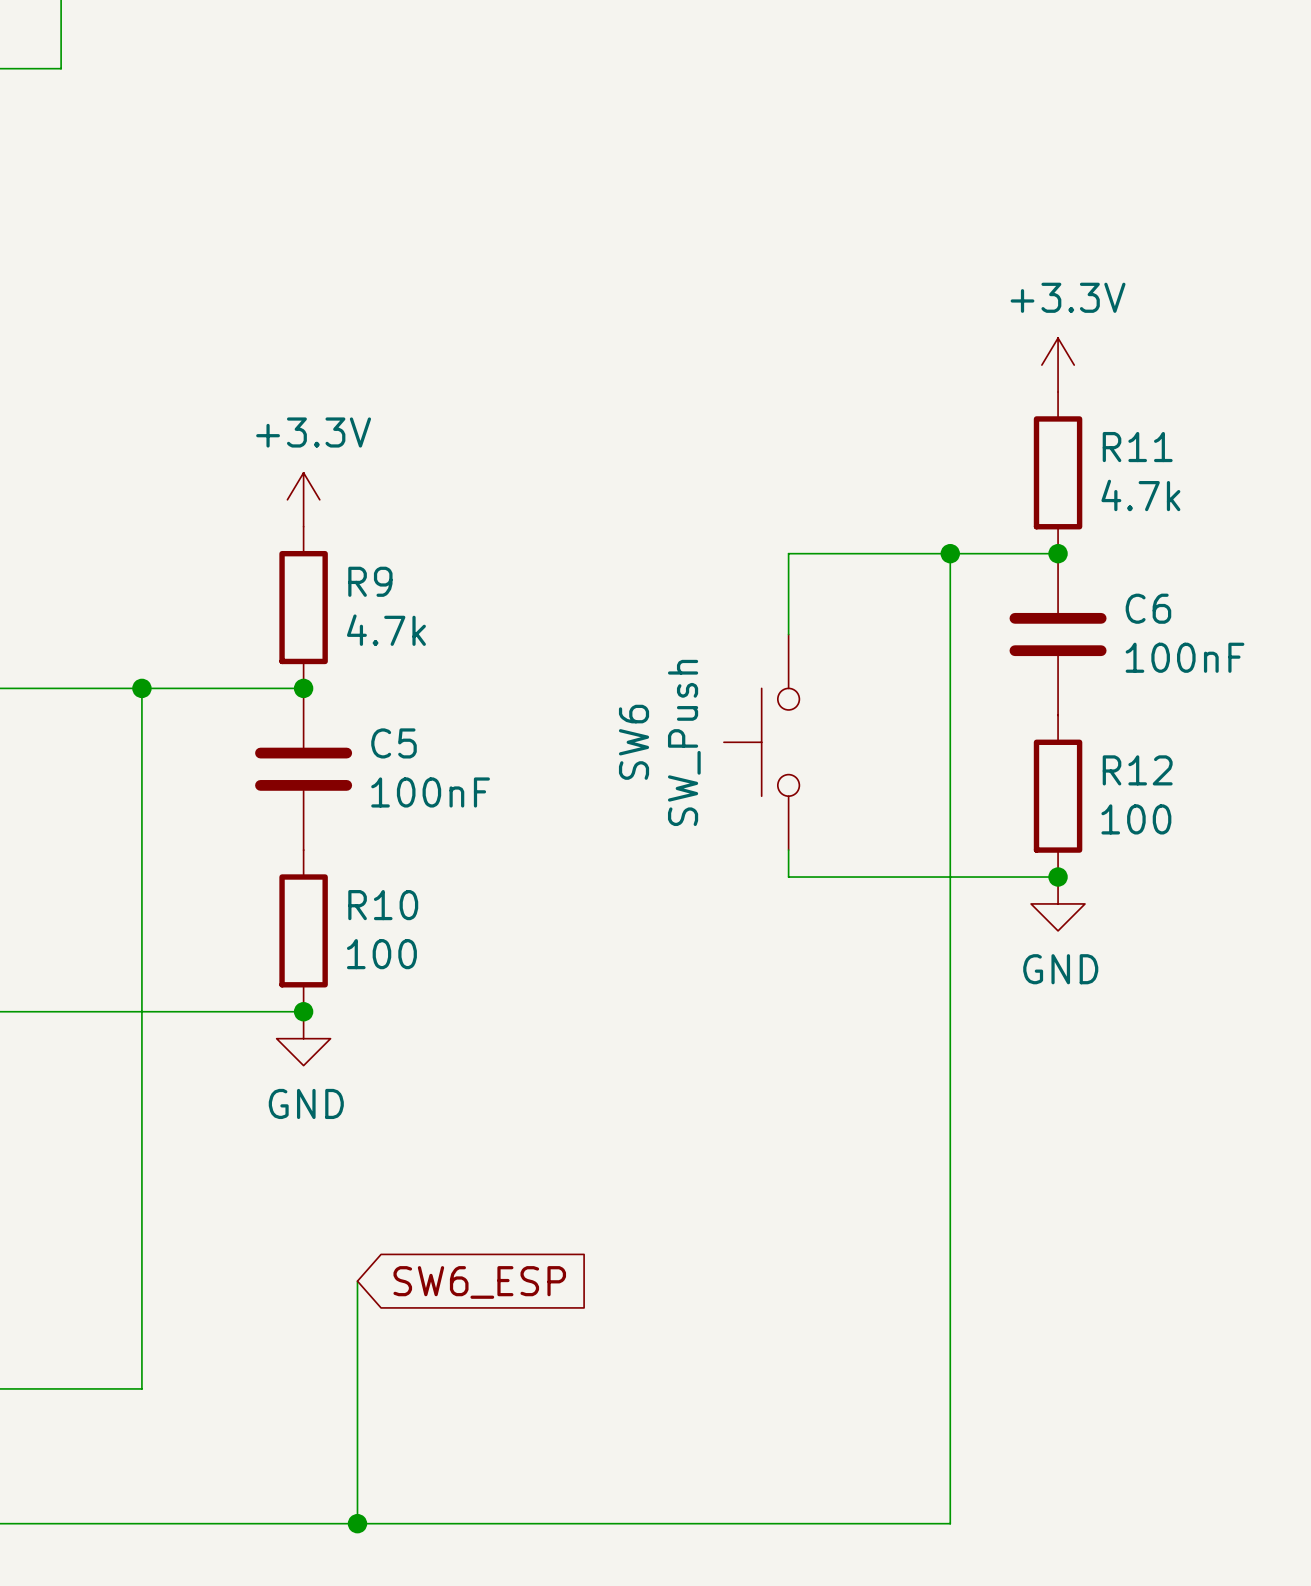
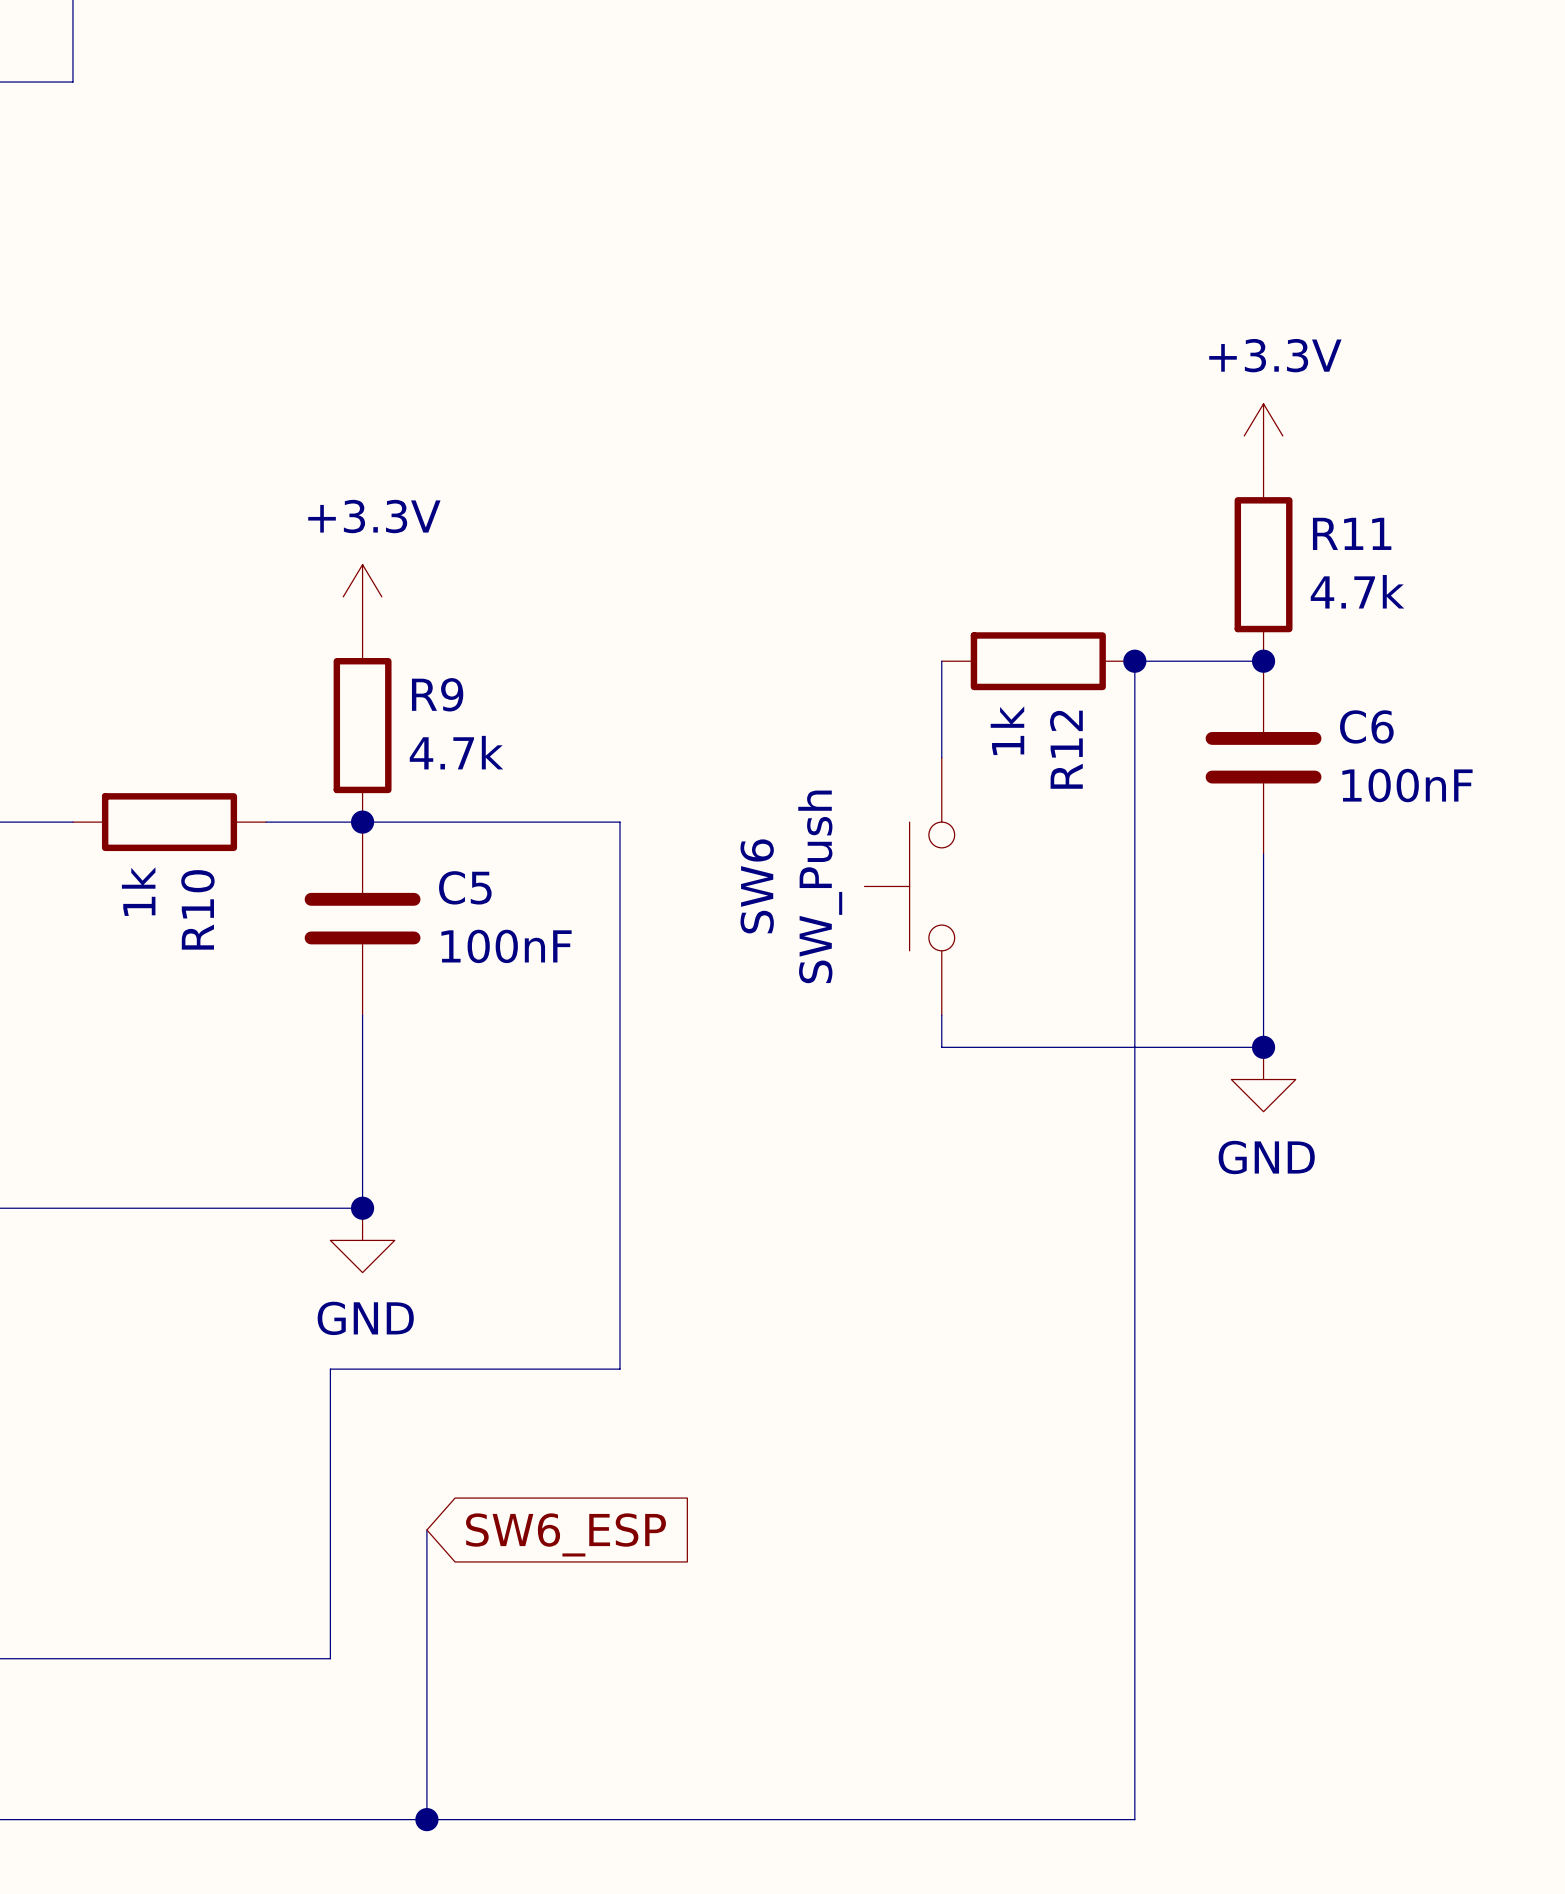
wire: (788, 553) (950, 553) -> none
wire: (61, 688) (222, 688) -> none
wire: (141, 688) (141, 1388) -> (362, 822) (619, 822) (619, 1369) (330, 1369) (330, 1658) (169, 1658)
junction: (141, 688) -> none
wire: none -> (1263, 854) (1263, 1047)
R12 rotation: 0° (1058, 796) -> 90° clockwise (1038, 661)
R12 position: (1058, 796) -> (1038, 661)
R12 value: 100 (1136, 819) -> 1k (1007, 730)
wire: none -> (362, 1015) (362, 1208)
R10 rotation: 0° (303, 930) -> 90° clockwise (169, 822)
R10 position: (303, 930) -> (169, 822)
R10 value: 100 (381, 954) -> 1k (138, 891)

